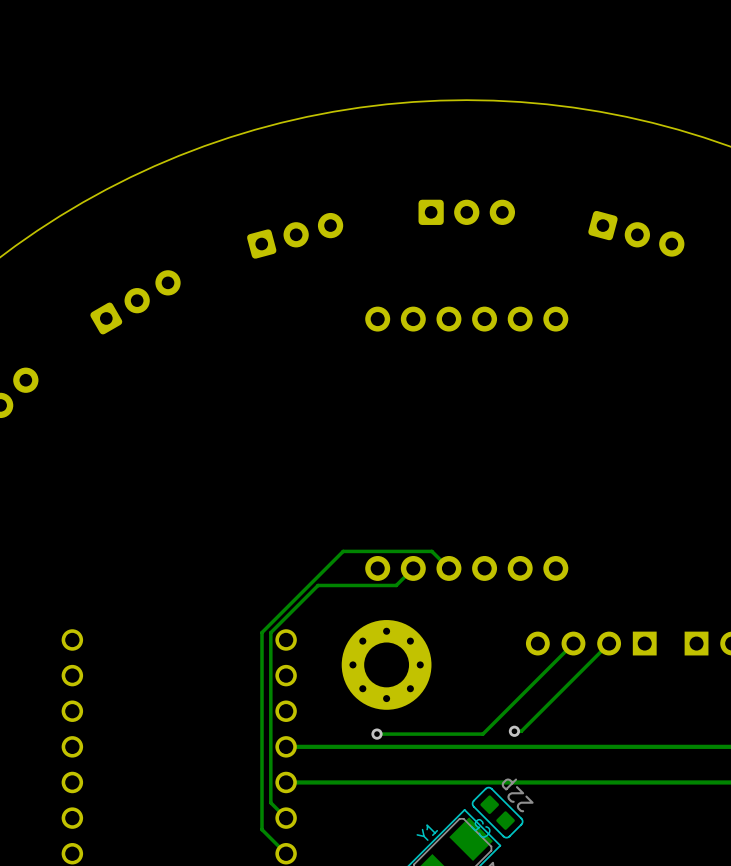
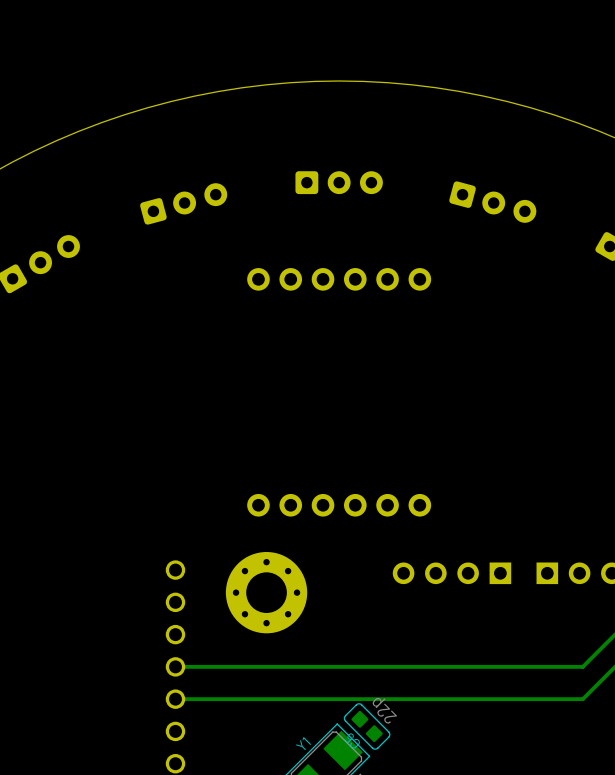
track: (413, 568) (396, 585) (318, 585) (270, 632) (270, 802) (286, 818) -> none
track: (448, 568) (431, 551) (343, 551) (261, 632) (261, 829) (286, 853) -> none
track: (573, 643) (482, 734) (376, 734) -> none
track: (609, 643) (521, 731) (514, 731) -> none
via: (514, 731) -> none
via: (376, 734) -> none

